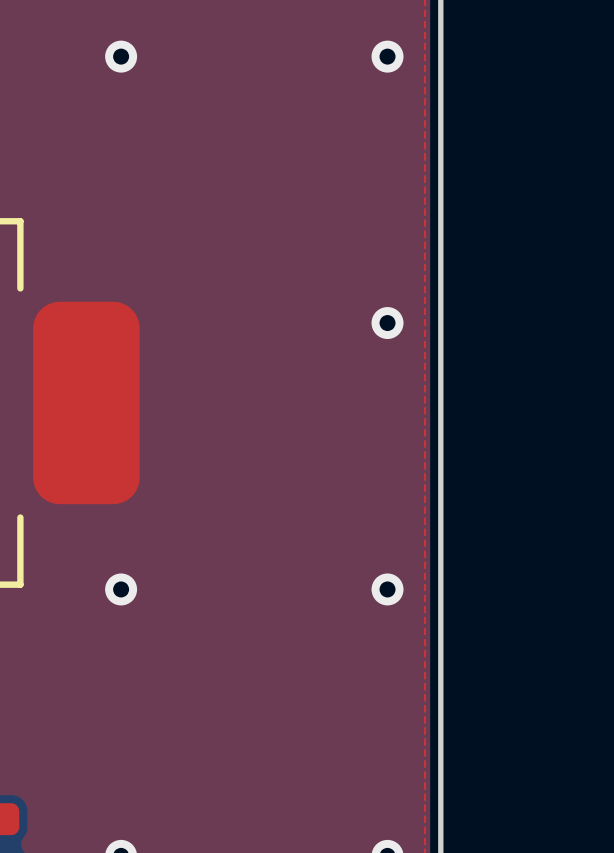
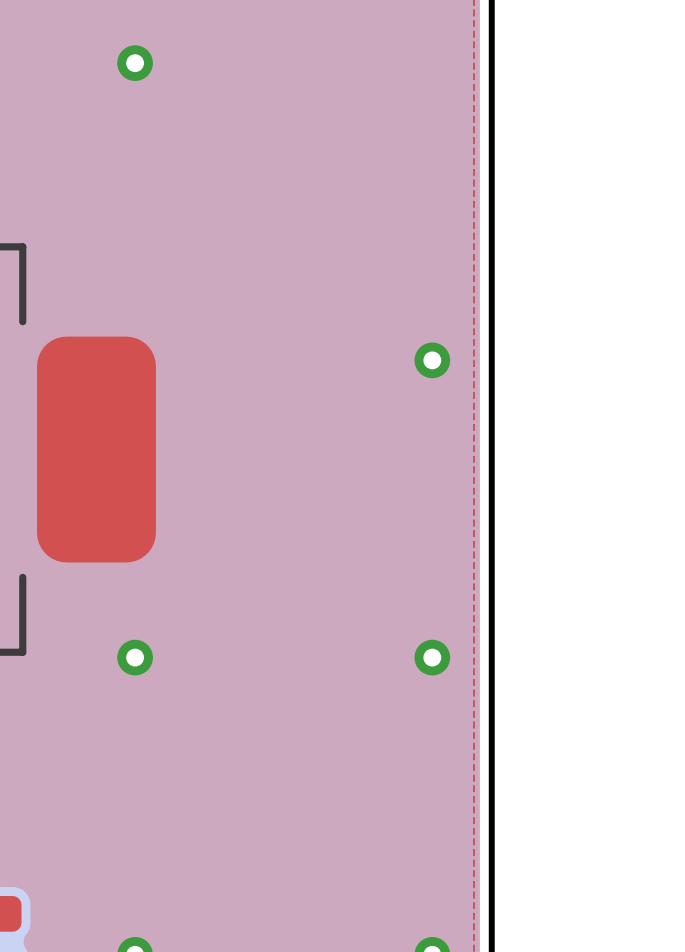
via: (387, 56) -> none

